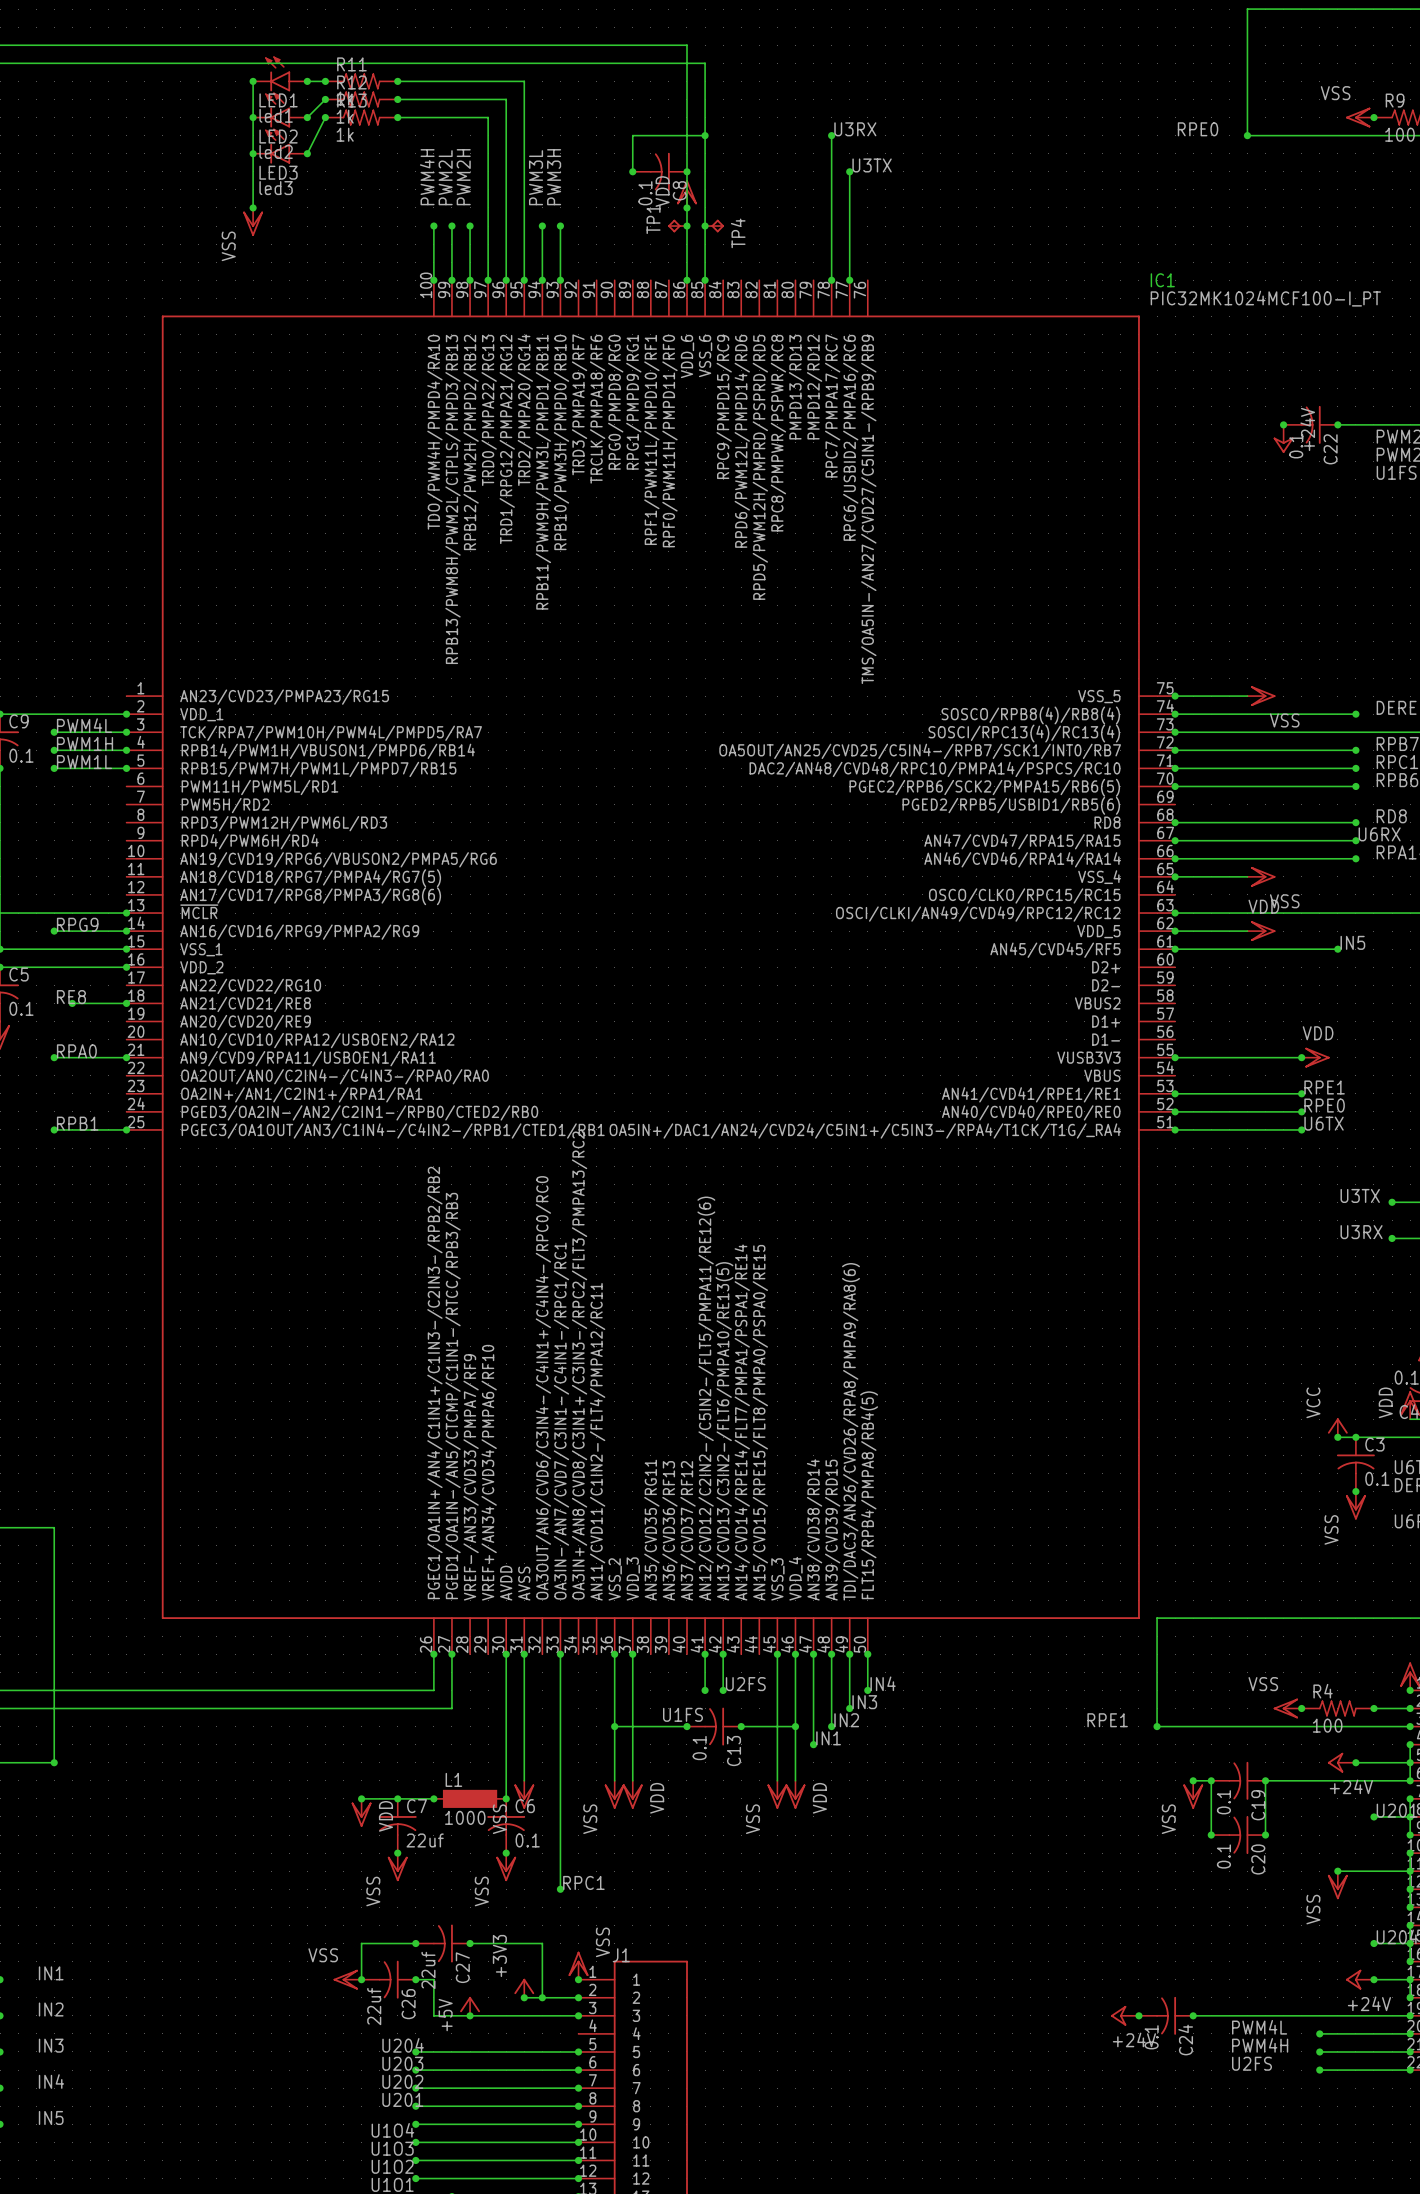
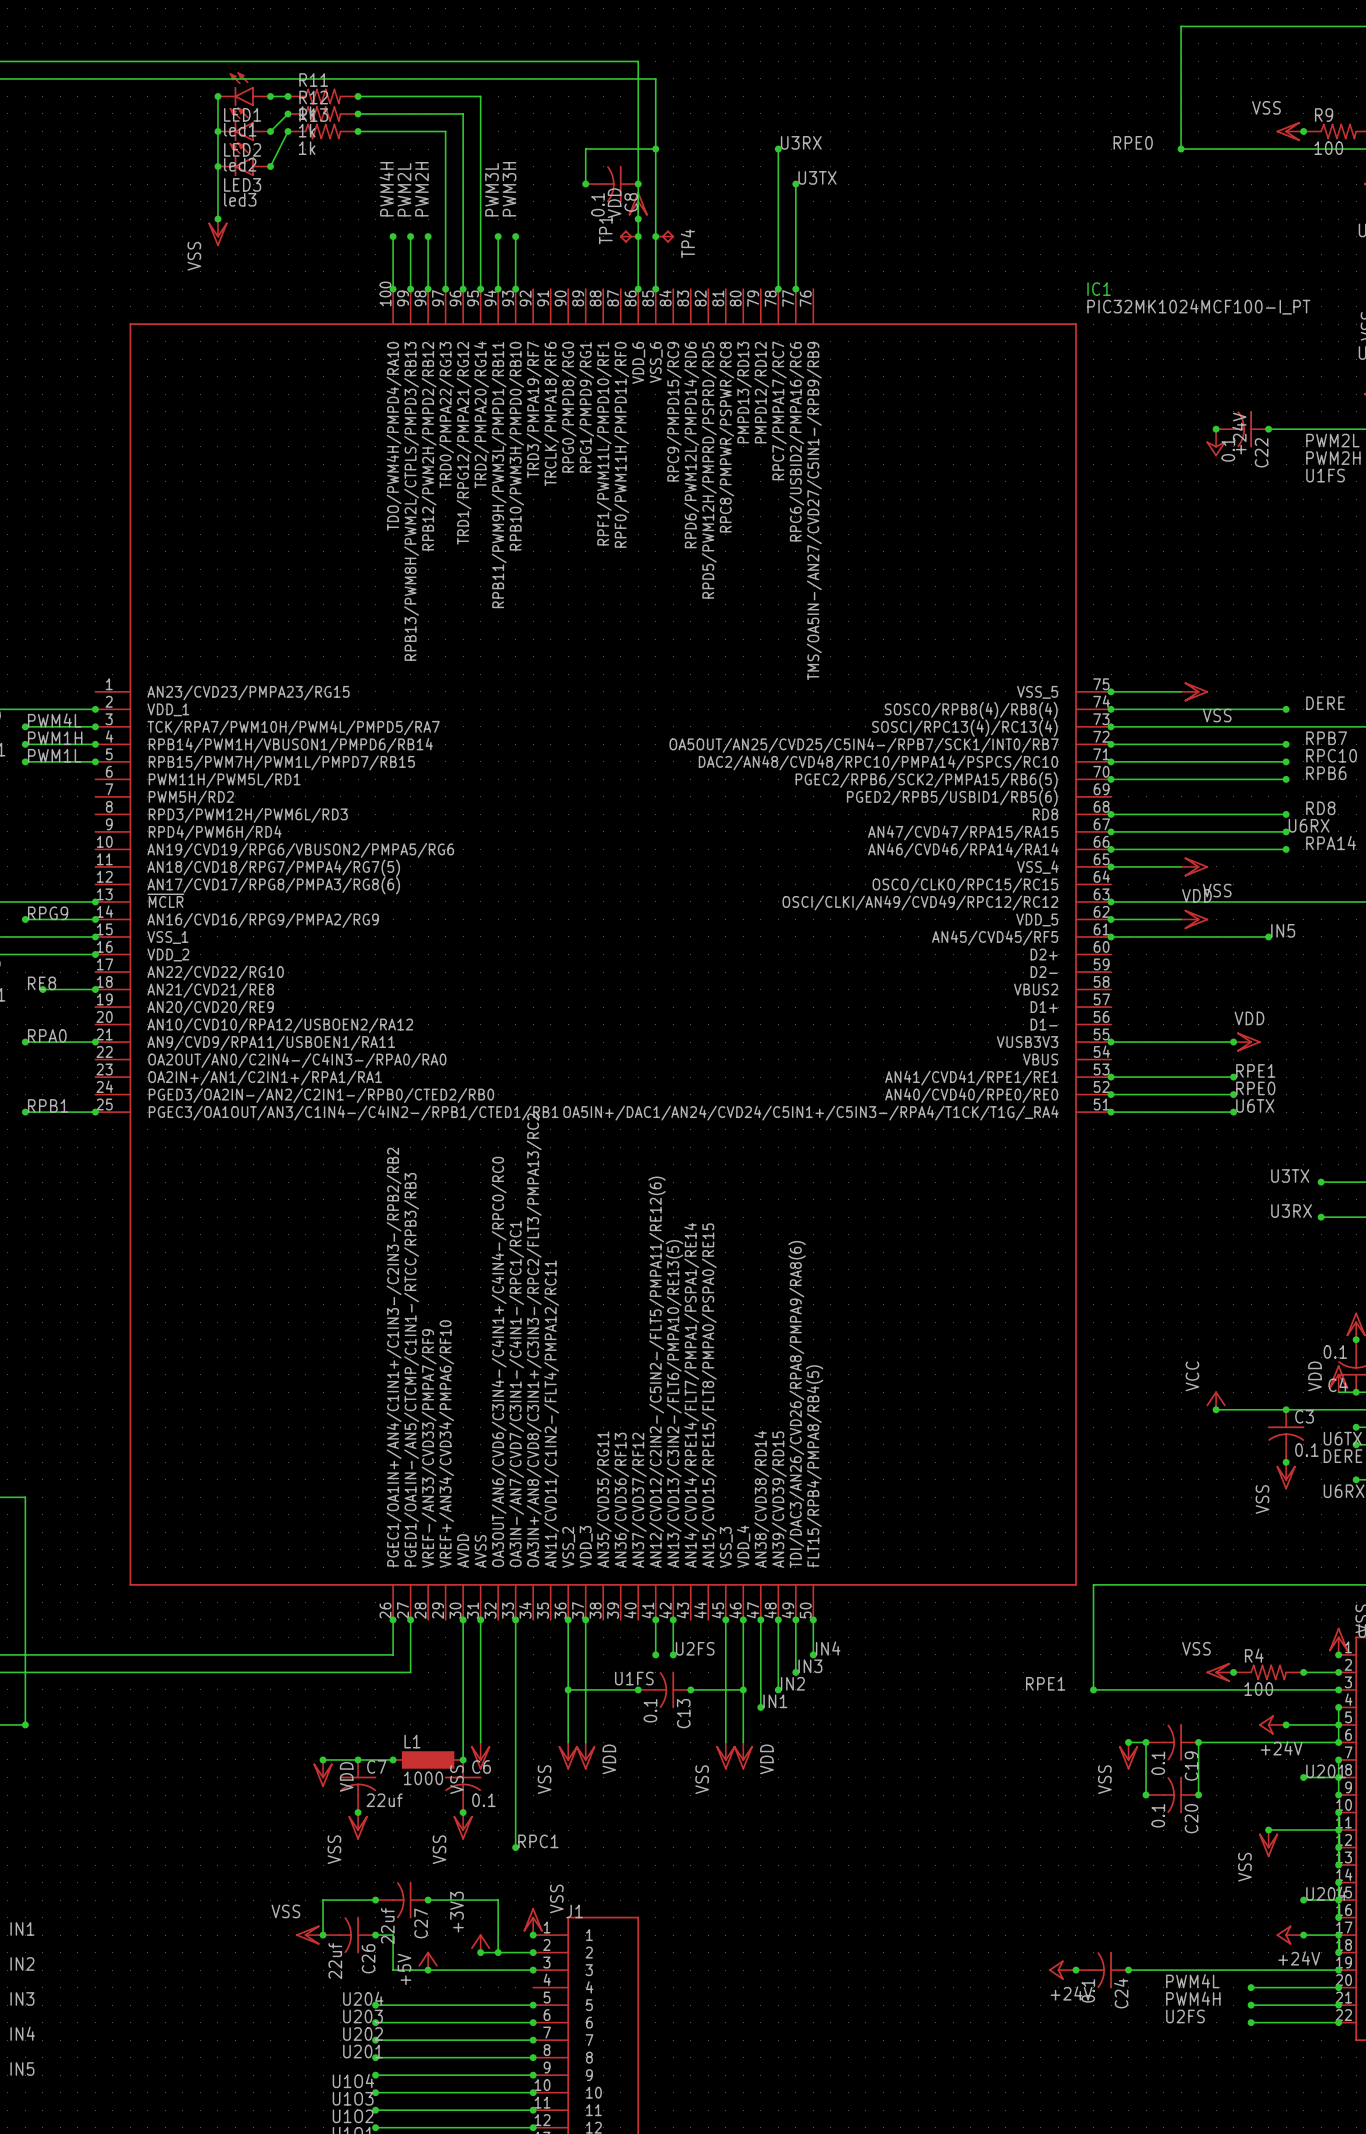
power symbol position: VCC (1337, 1427) -> VCC (1216, 1400)
wire: none -> (1216, 1409) (1268, 1409)
junction: none -> (1216, 1409)
junction: (1337, 1437) -> none

